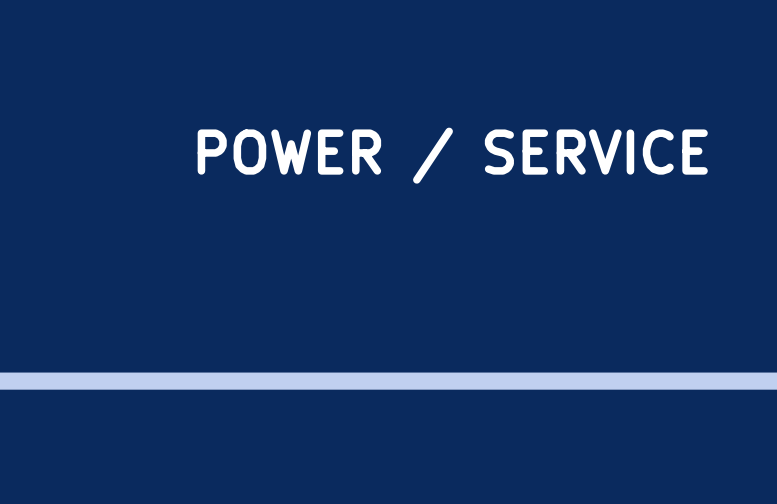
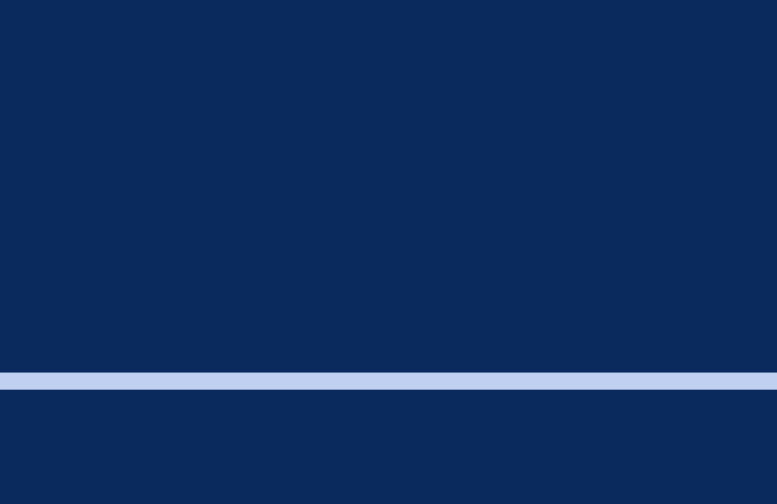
text: POWER / SERVICE (452, 155) -> none

